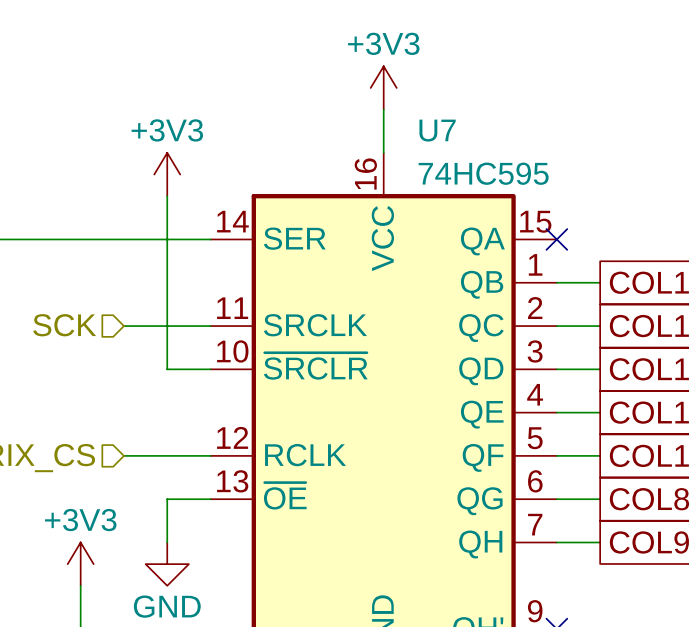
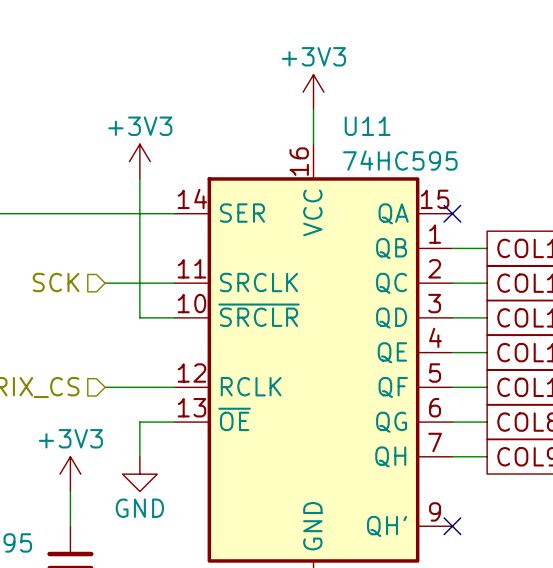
U7 name: U7 (437, 130) -> U11 (367, 126)

